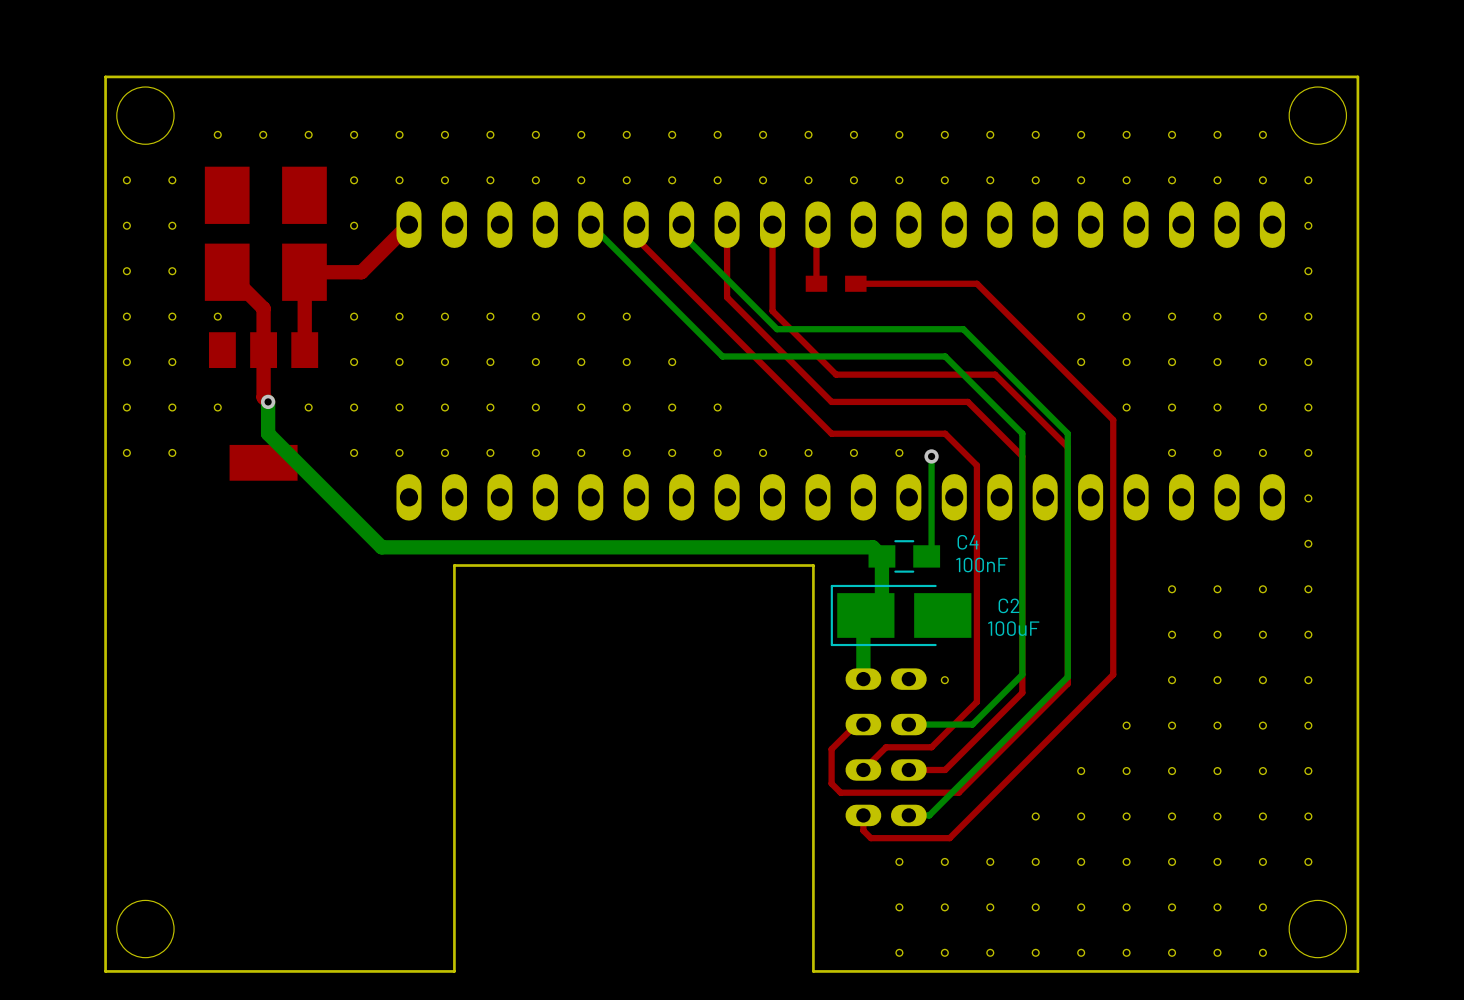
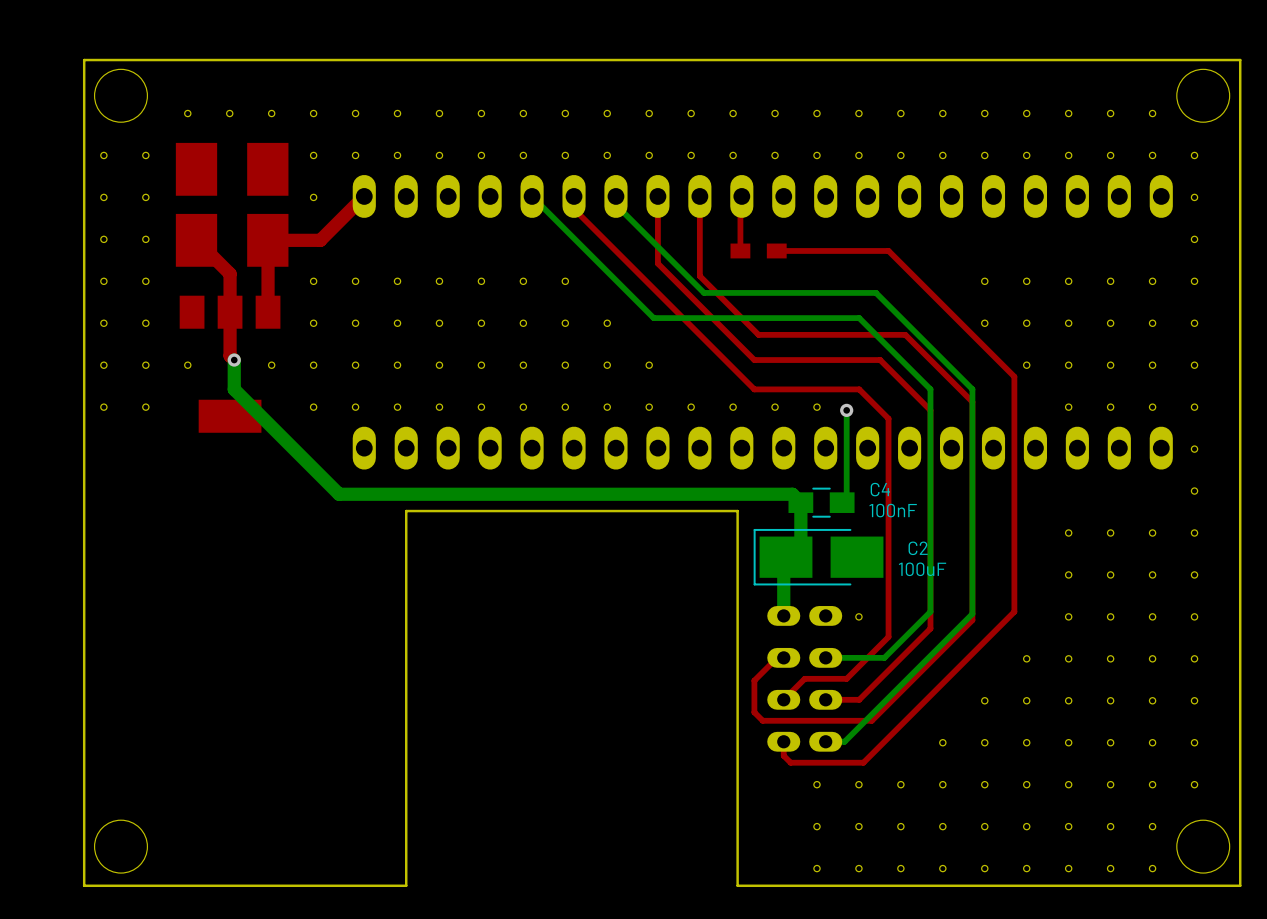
part: (217, 316) -> none

